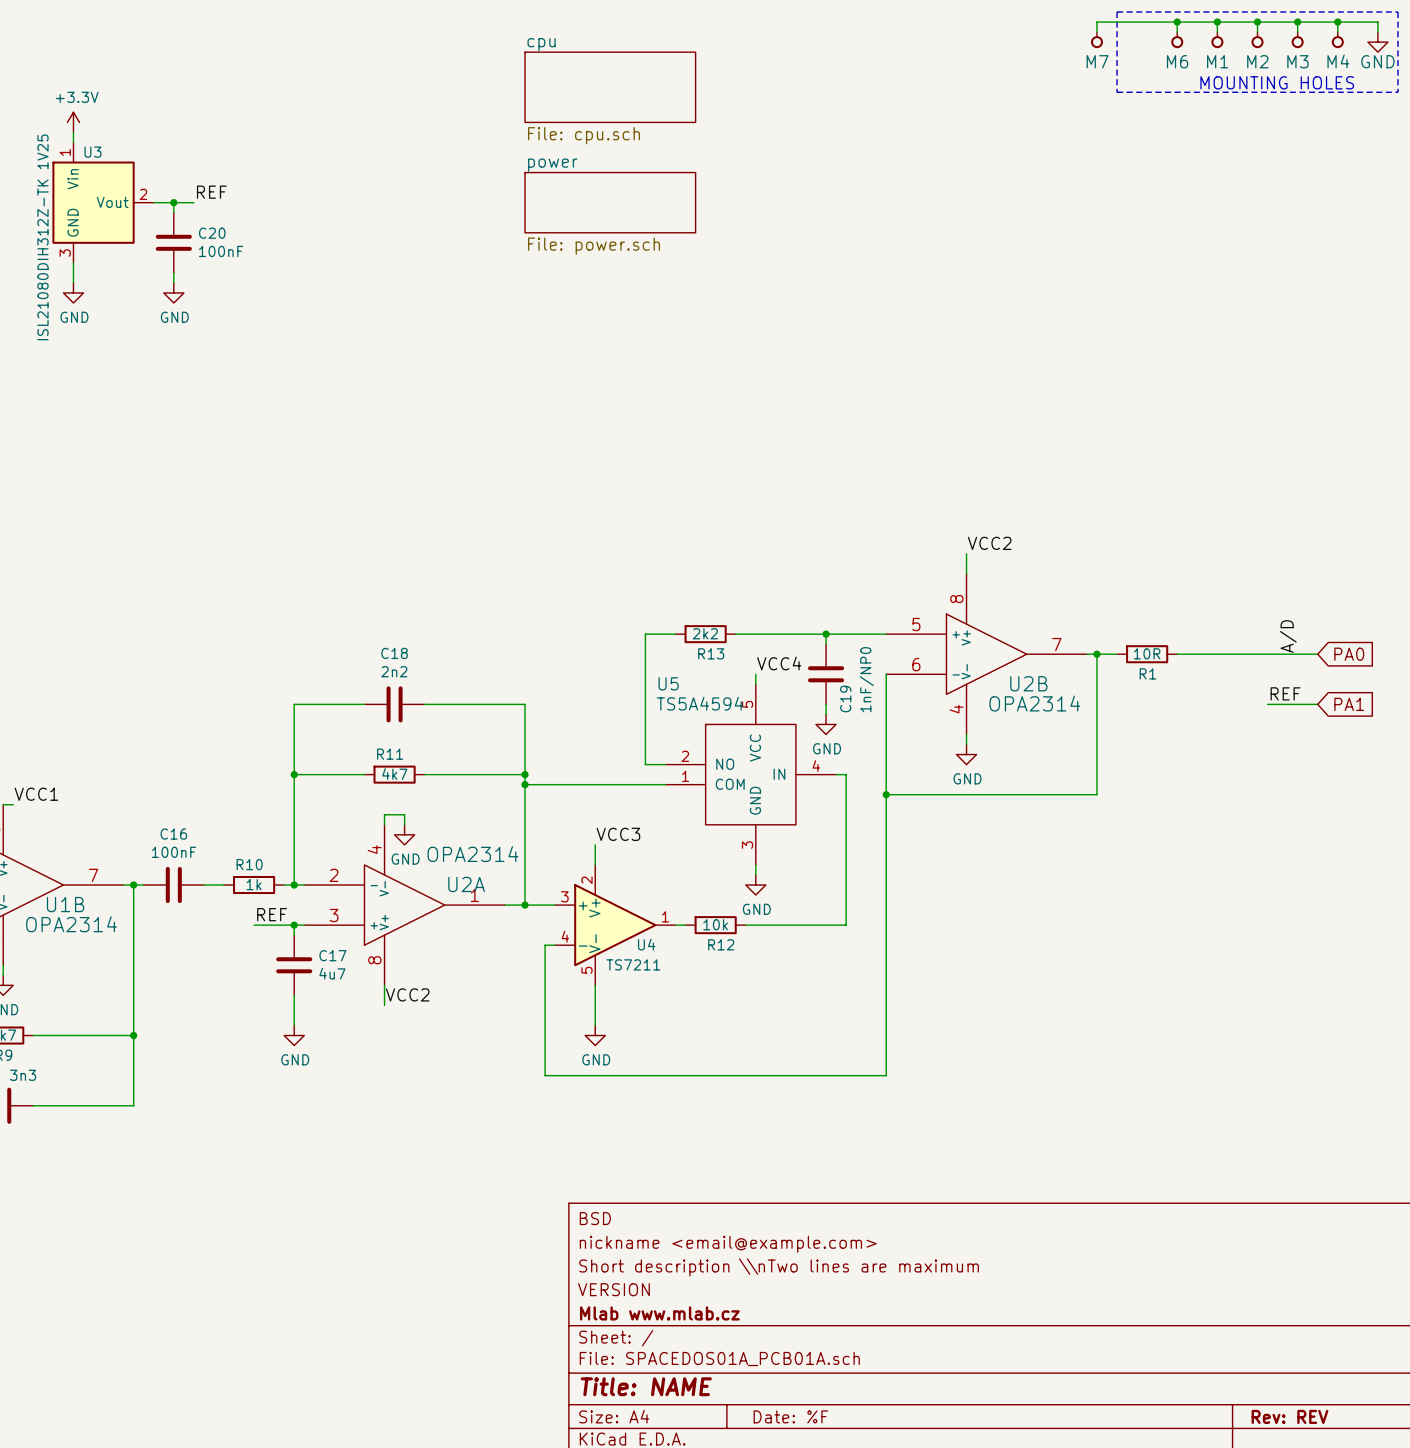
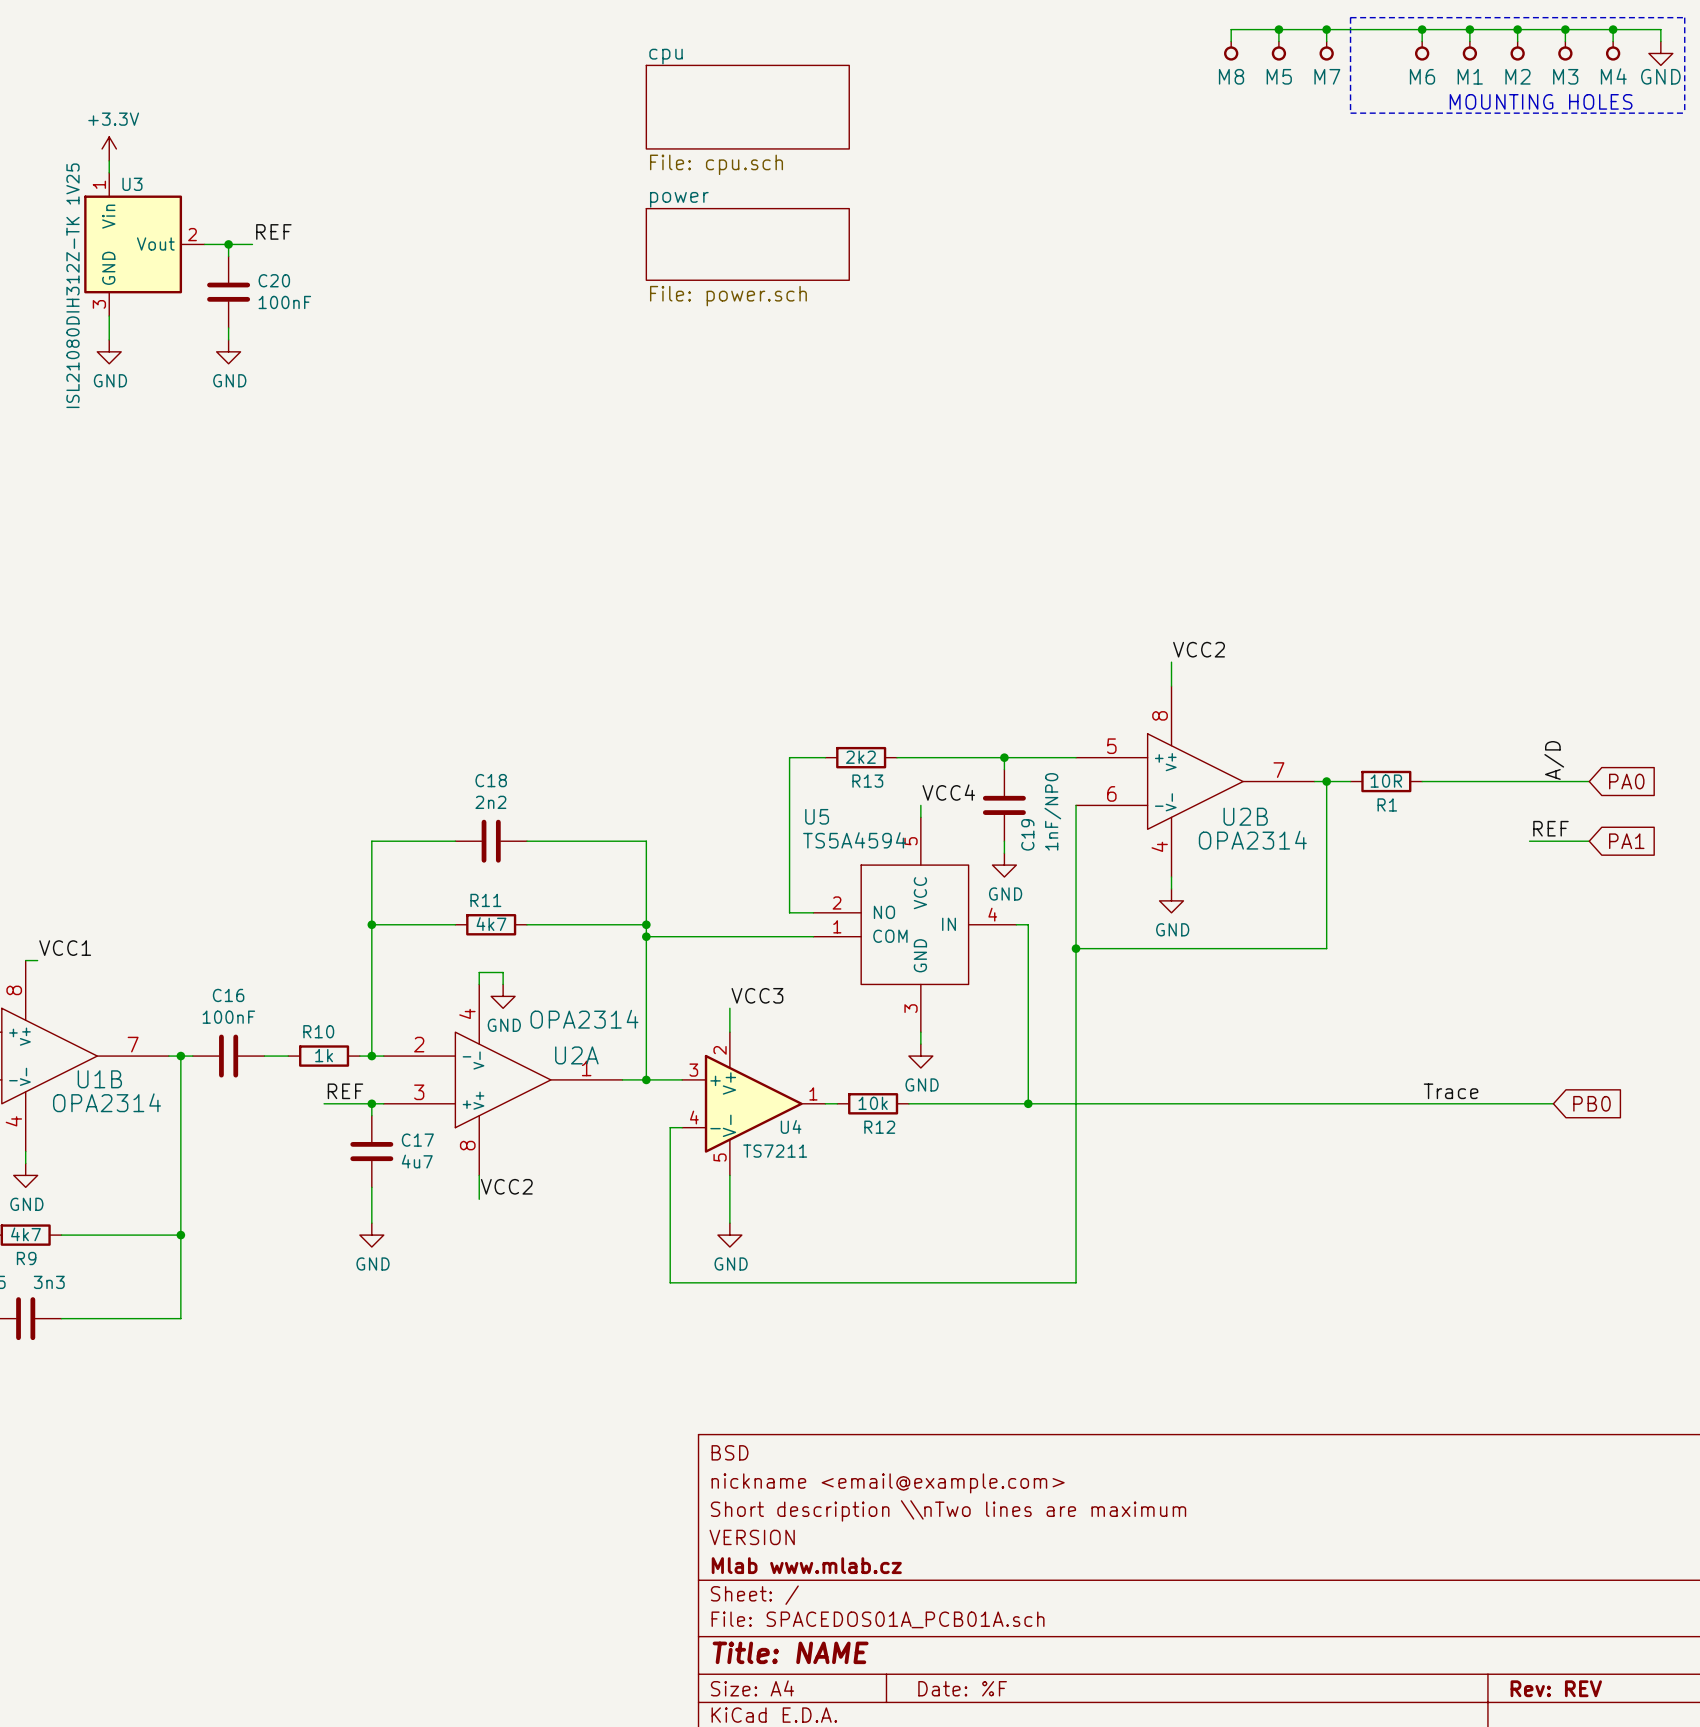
wire: none -> (1278, 29) (1278, 41)
junction: none -> (1278, 29)
wire: none -> (1326, 29) (1231, 29) (1231, 41)
junction: none -> (1326, 29)
M8: none -> (1231, 51)
M5: none -> (1278, 51)
label: none -> Trace (1451, 1091)
wire: none -> (1028, 1103) (1553, 1103)
junction: none -> (1028, 1103)
global label: none -> PB0 (1591, 1103)

